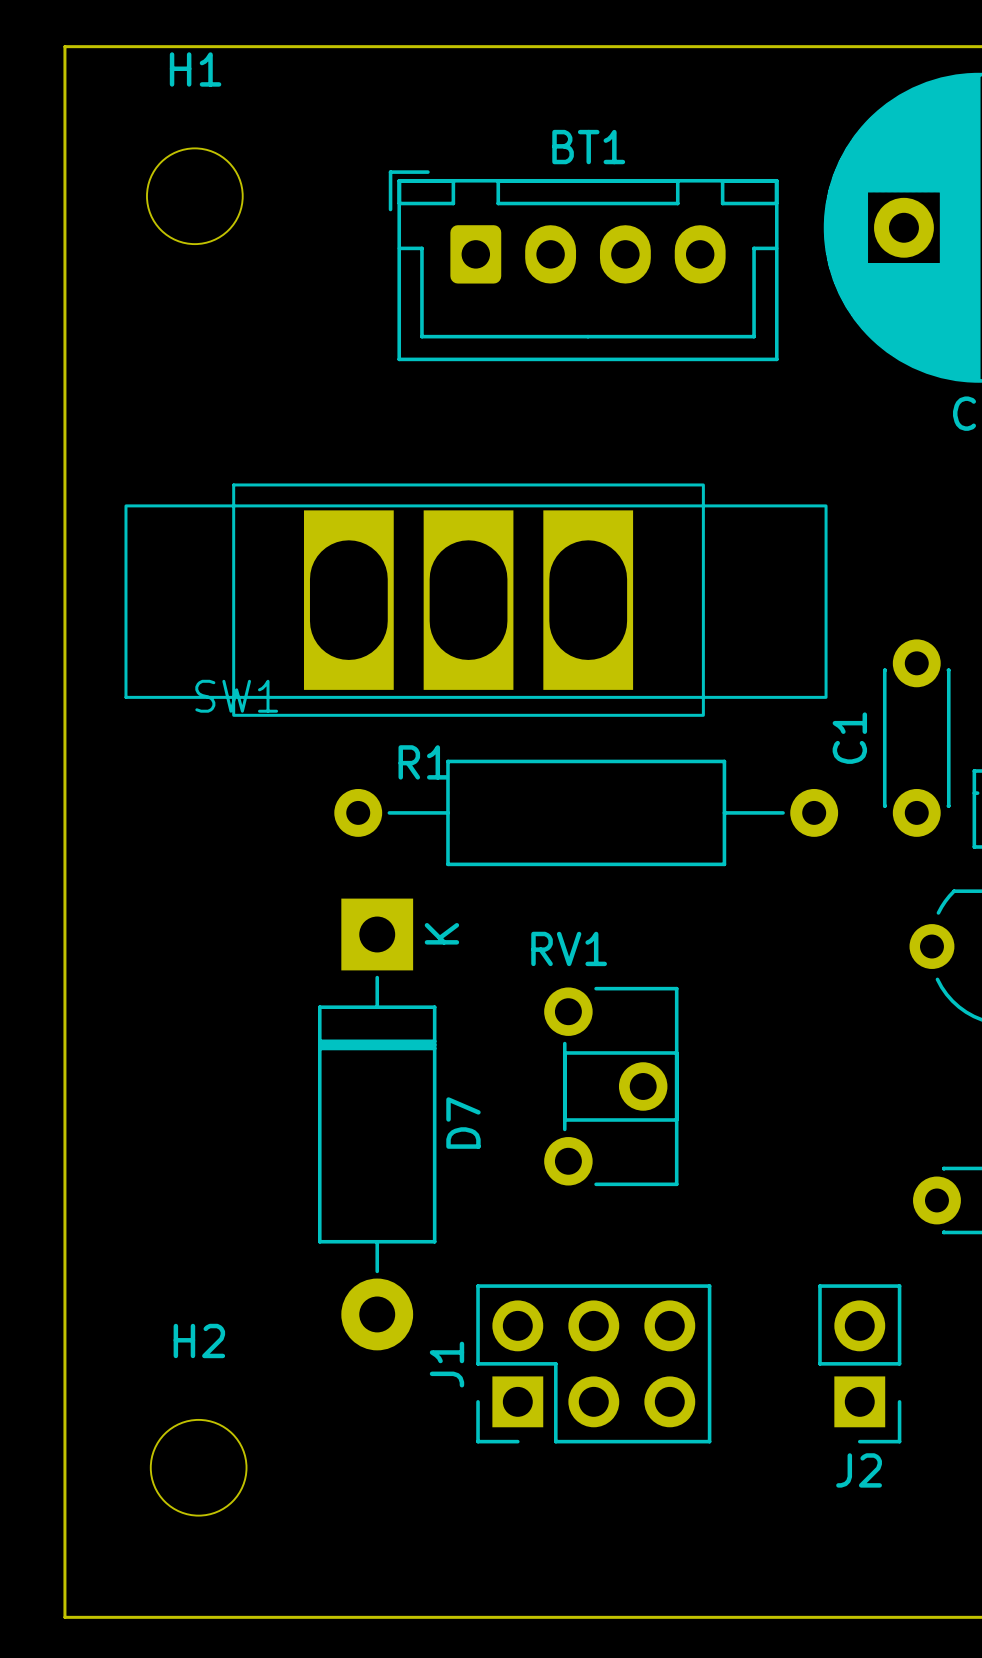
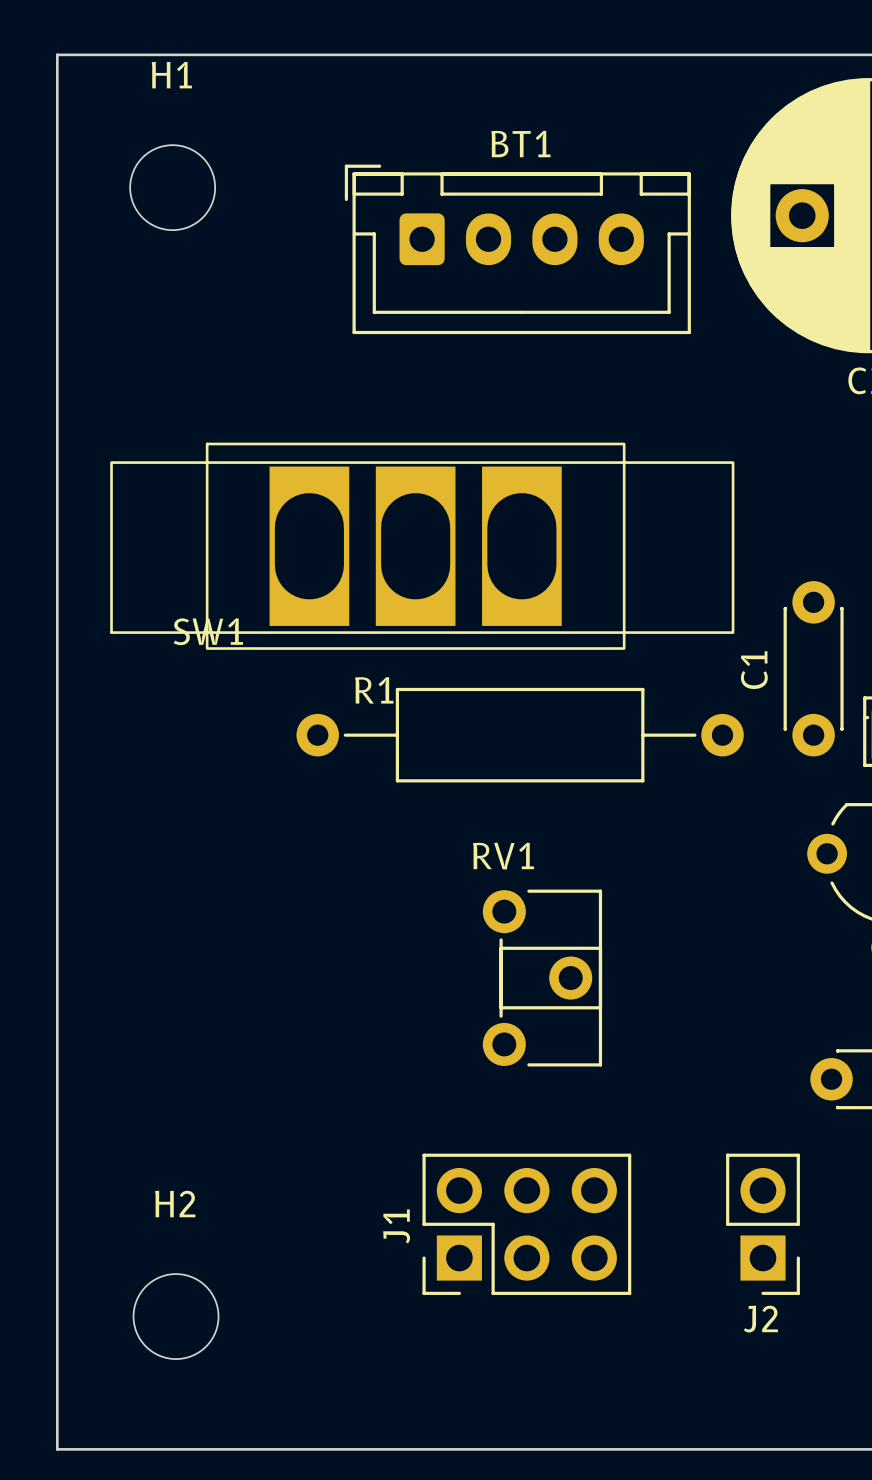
D7: (377, 1124) -> none

